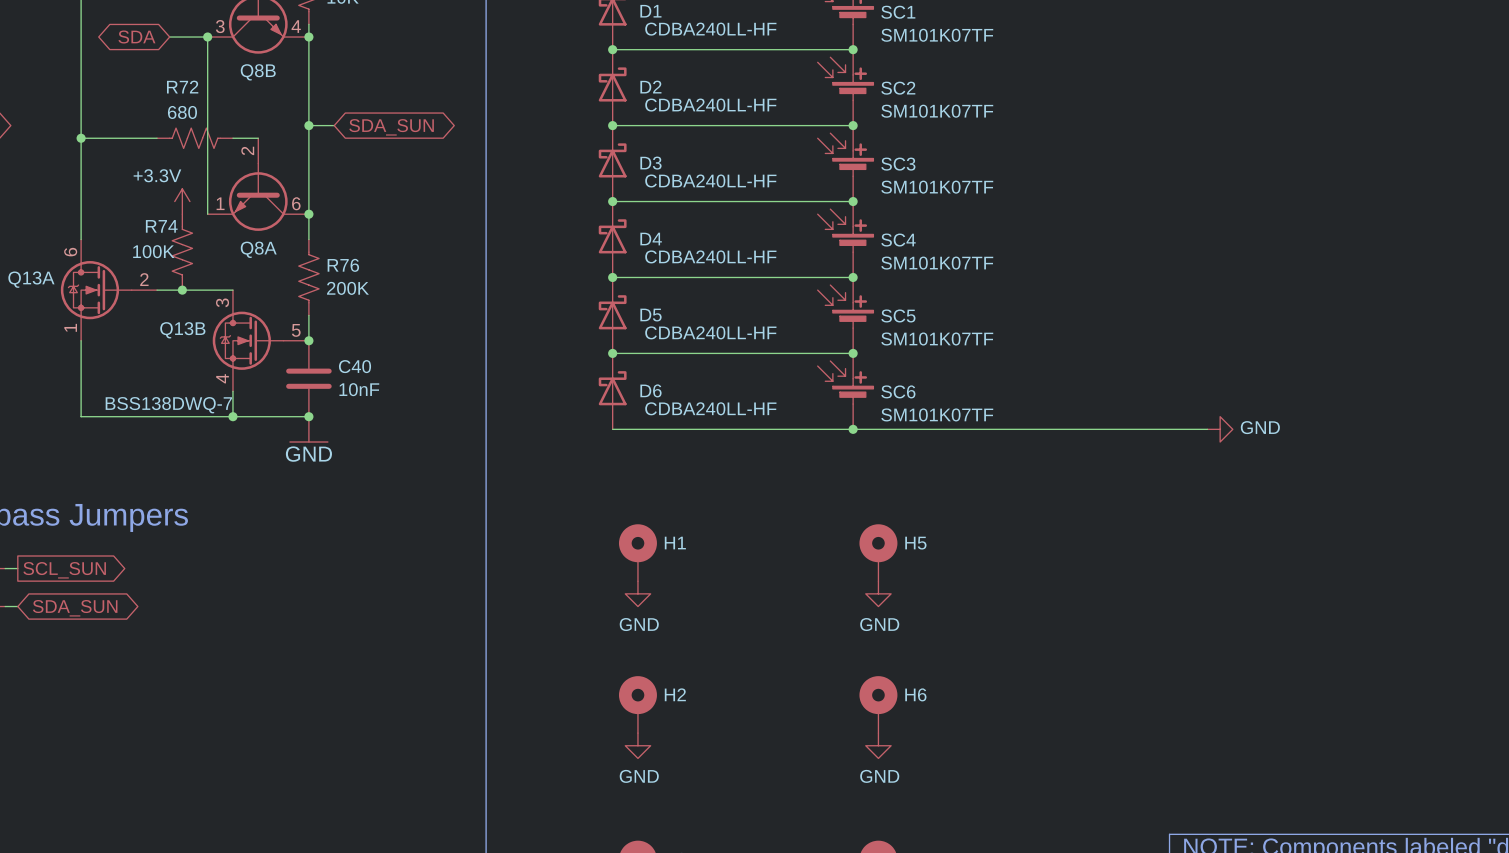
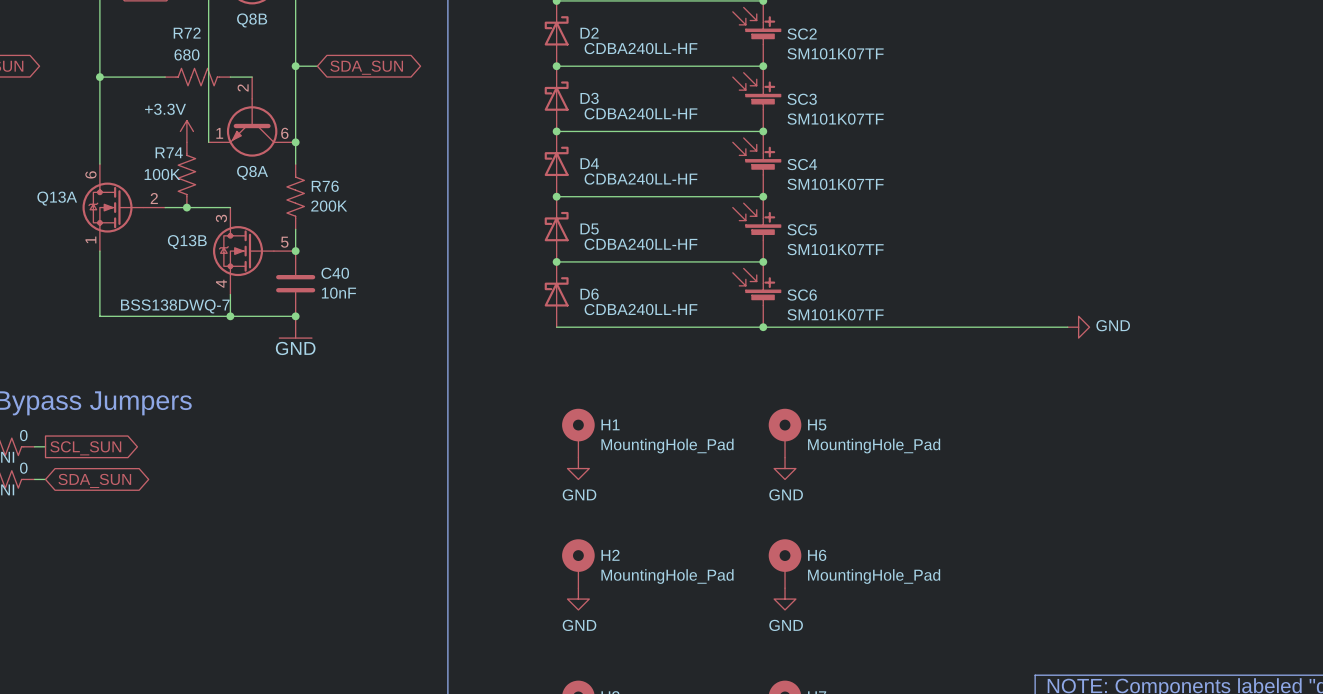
H1 value: none -> MountingHole_Pad (667, 446)
H5 value: none -> MountingHole_Pad (874, 446)
H2 value: none -> MountingHole_Pad (667, 576)
H6 value: none -> MountingHole_Pad (874, 576)

